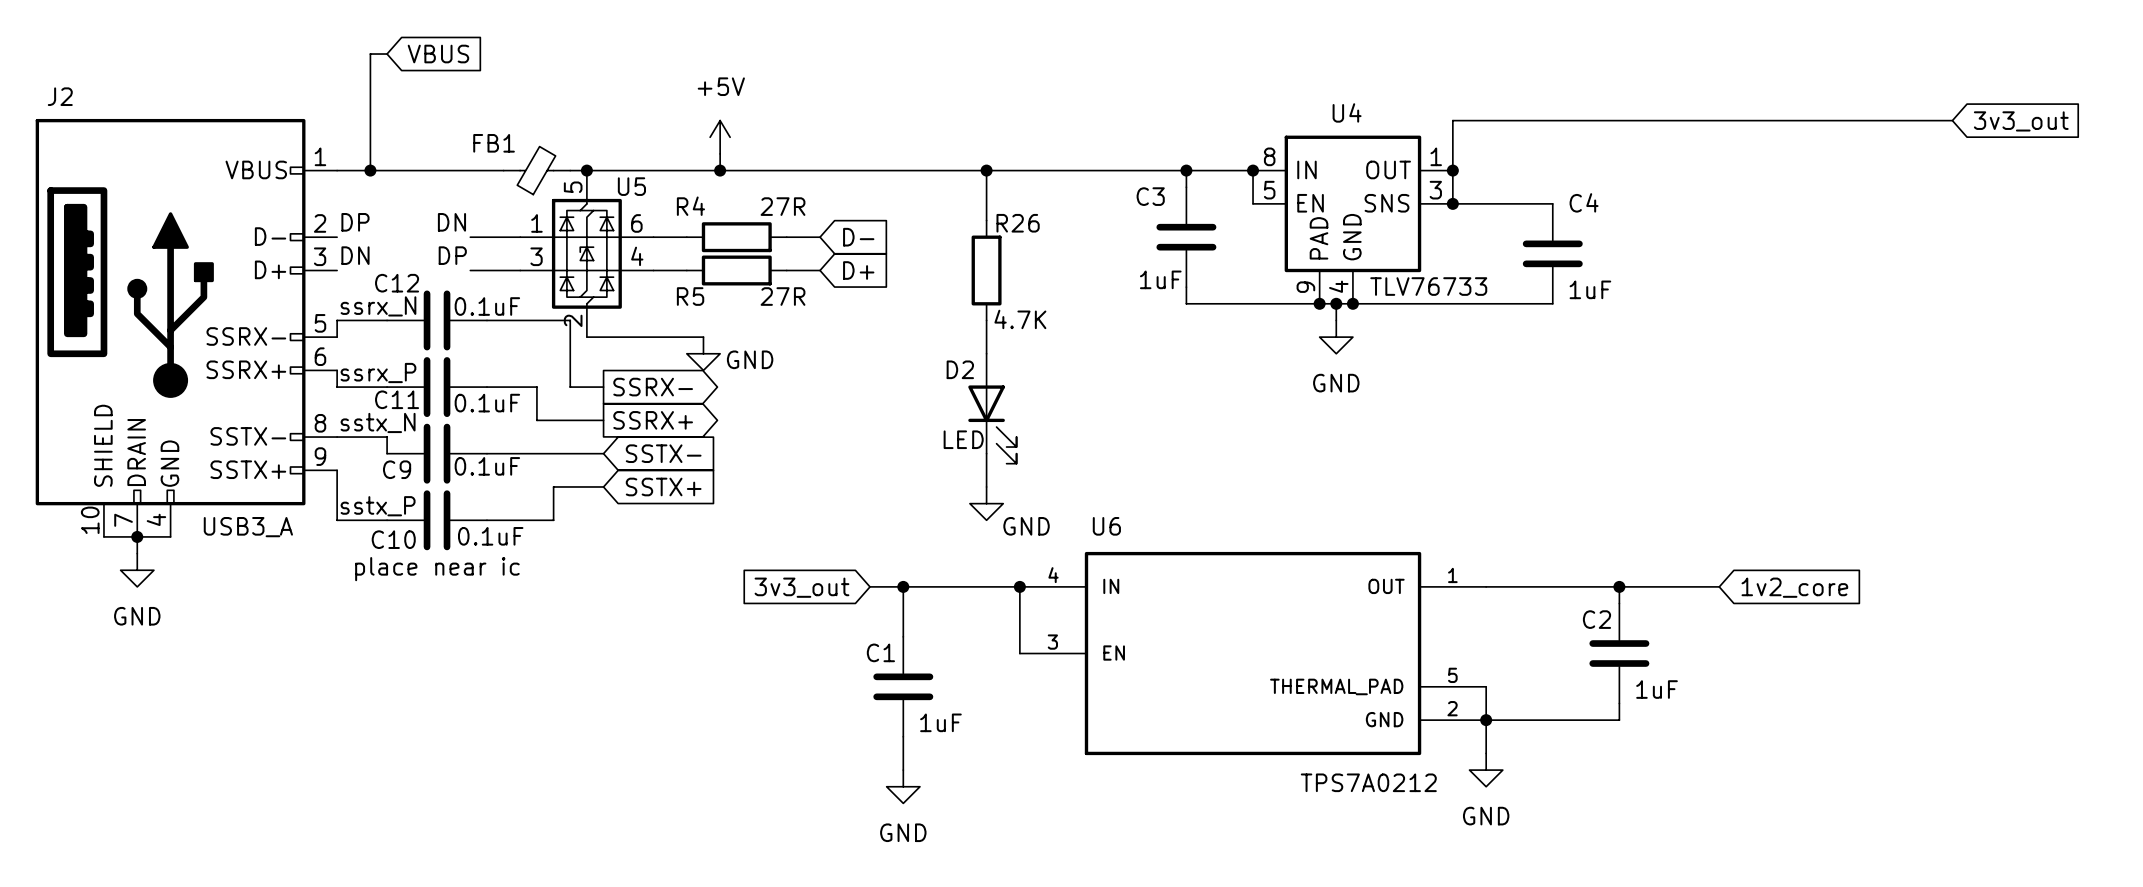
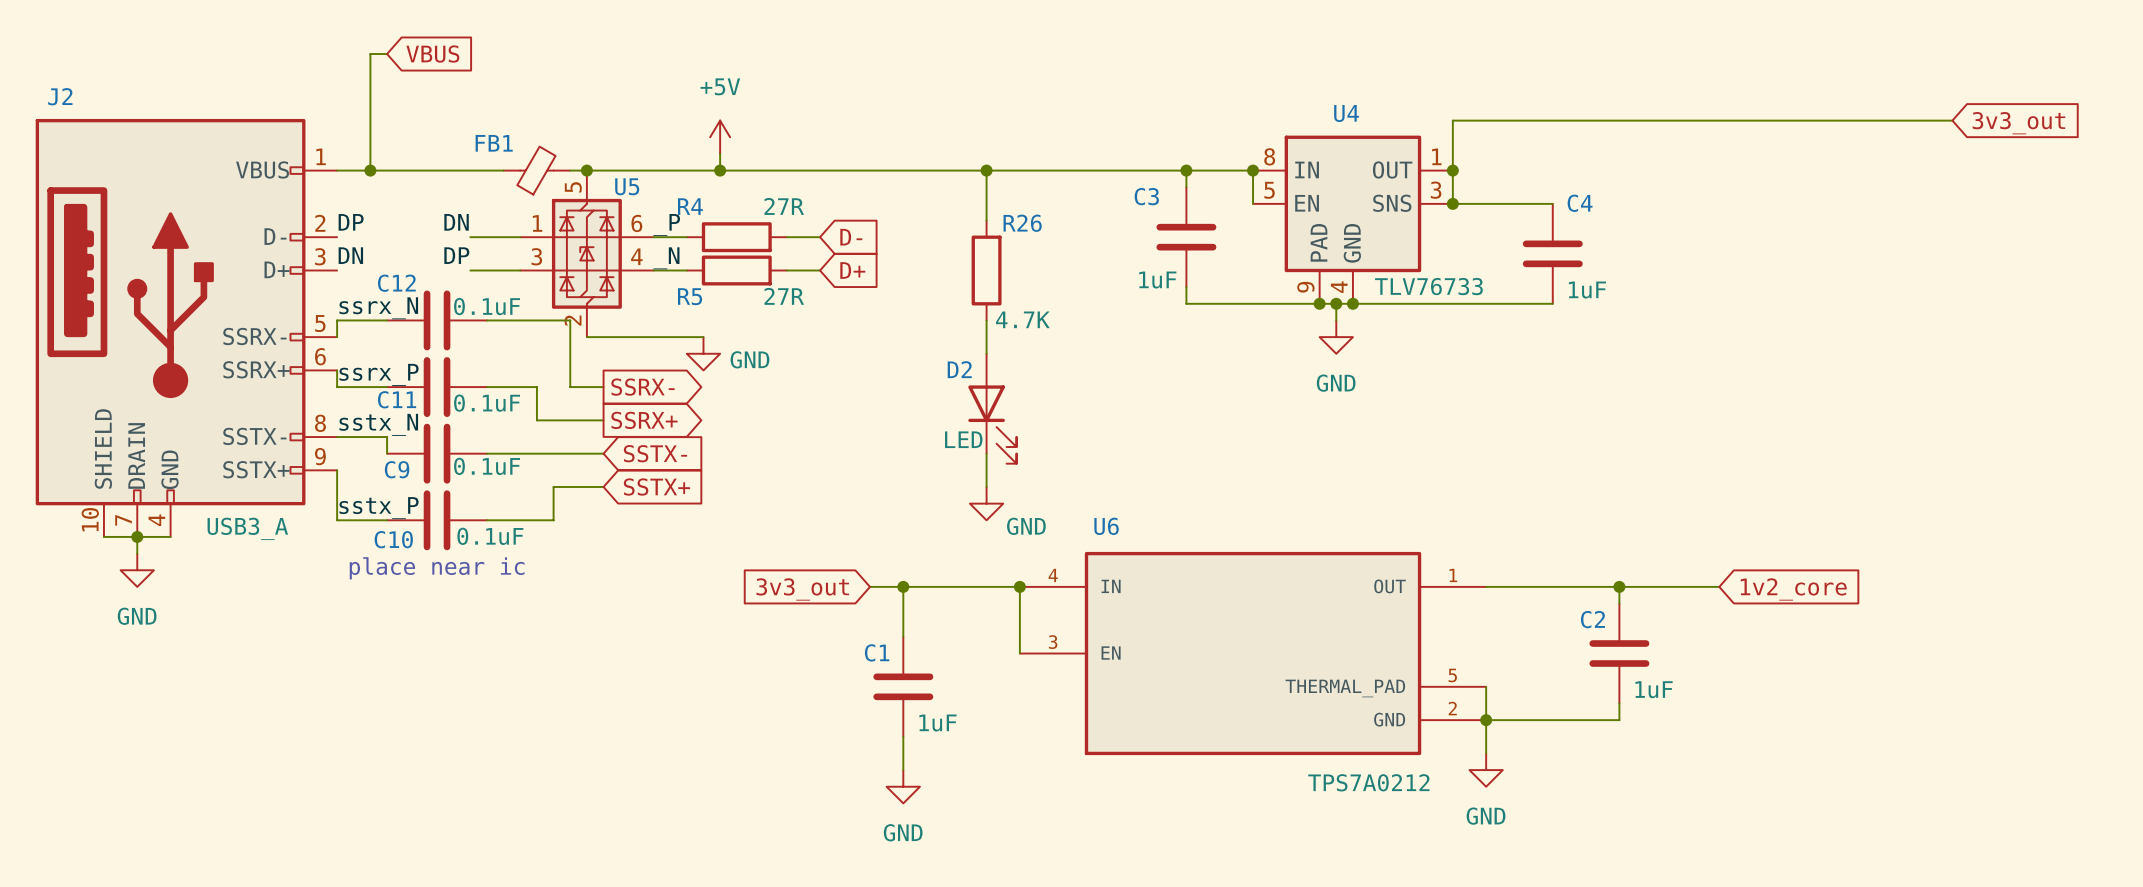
label: none -> _P (666, 225)
label: none -> _N (666, 258)

